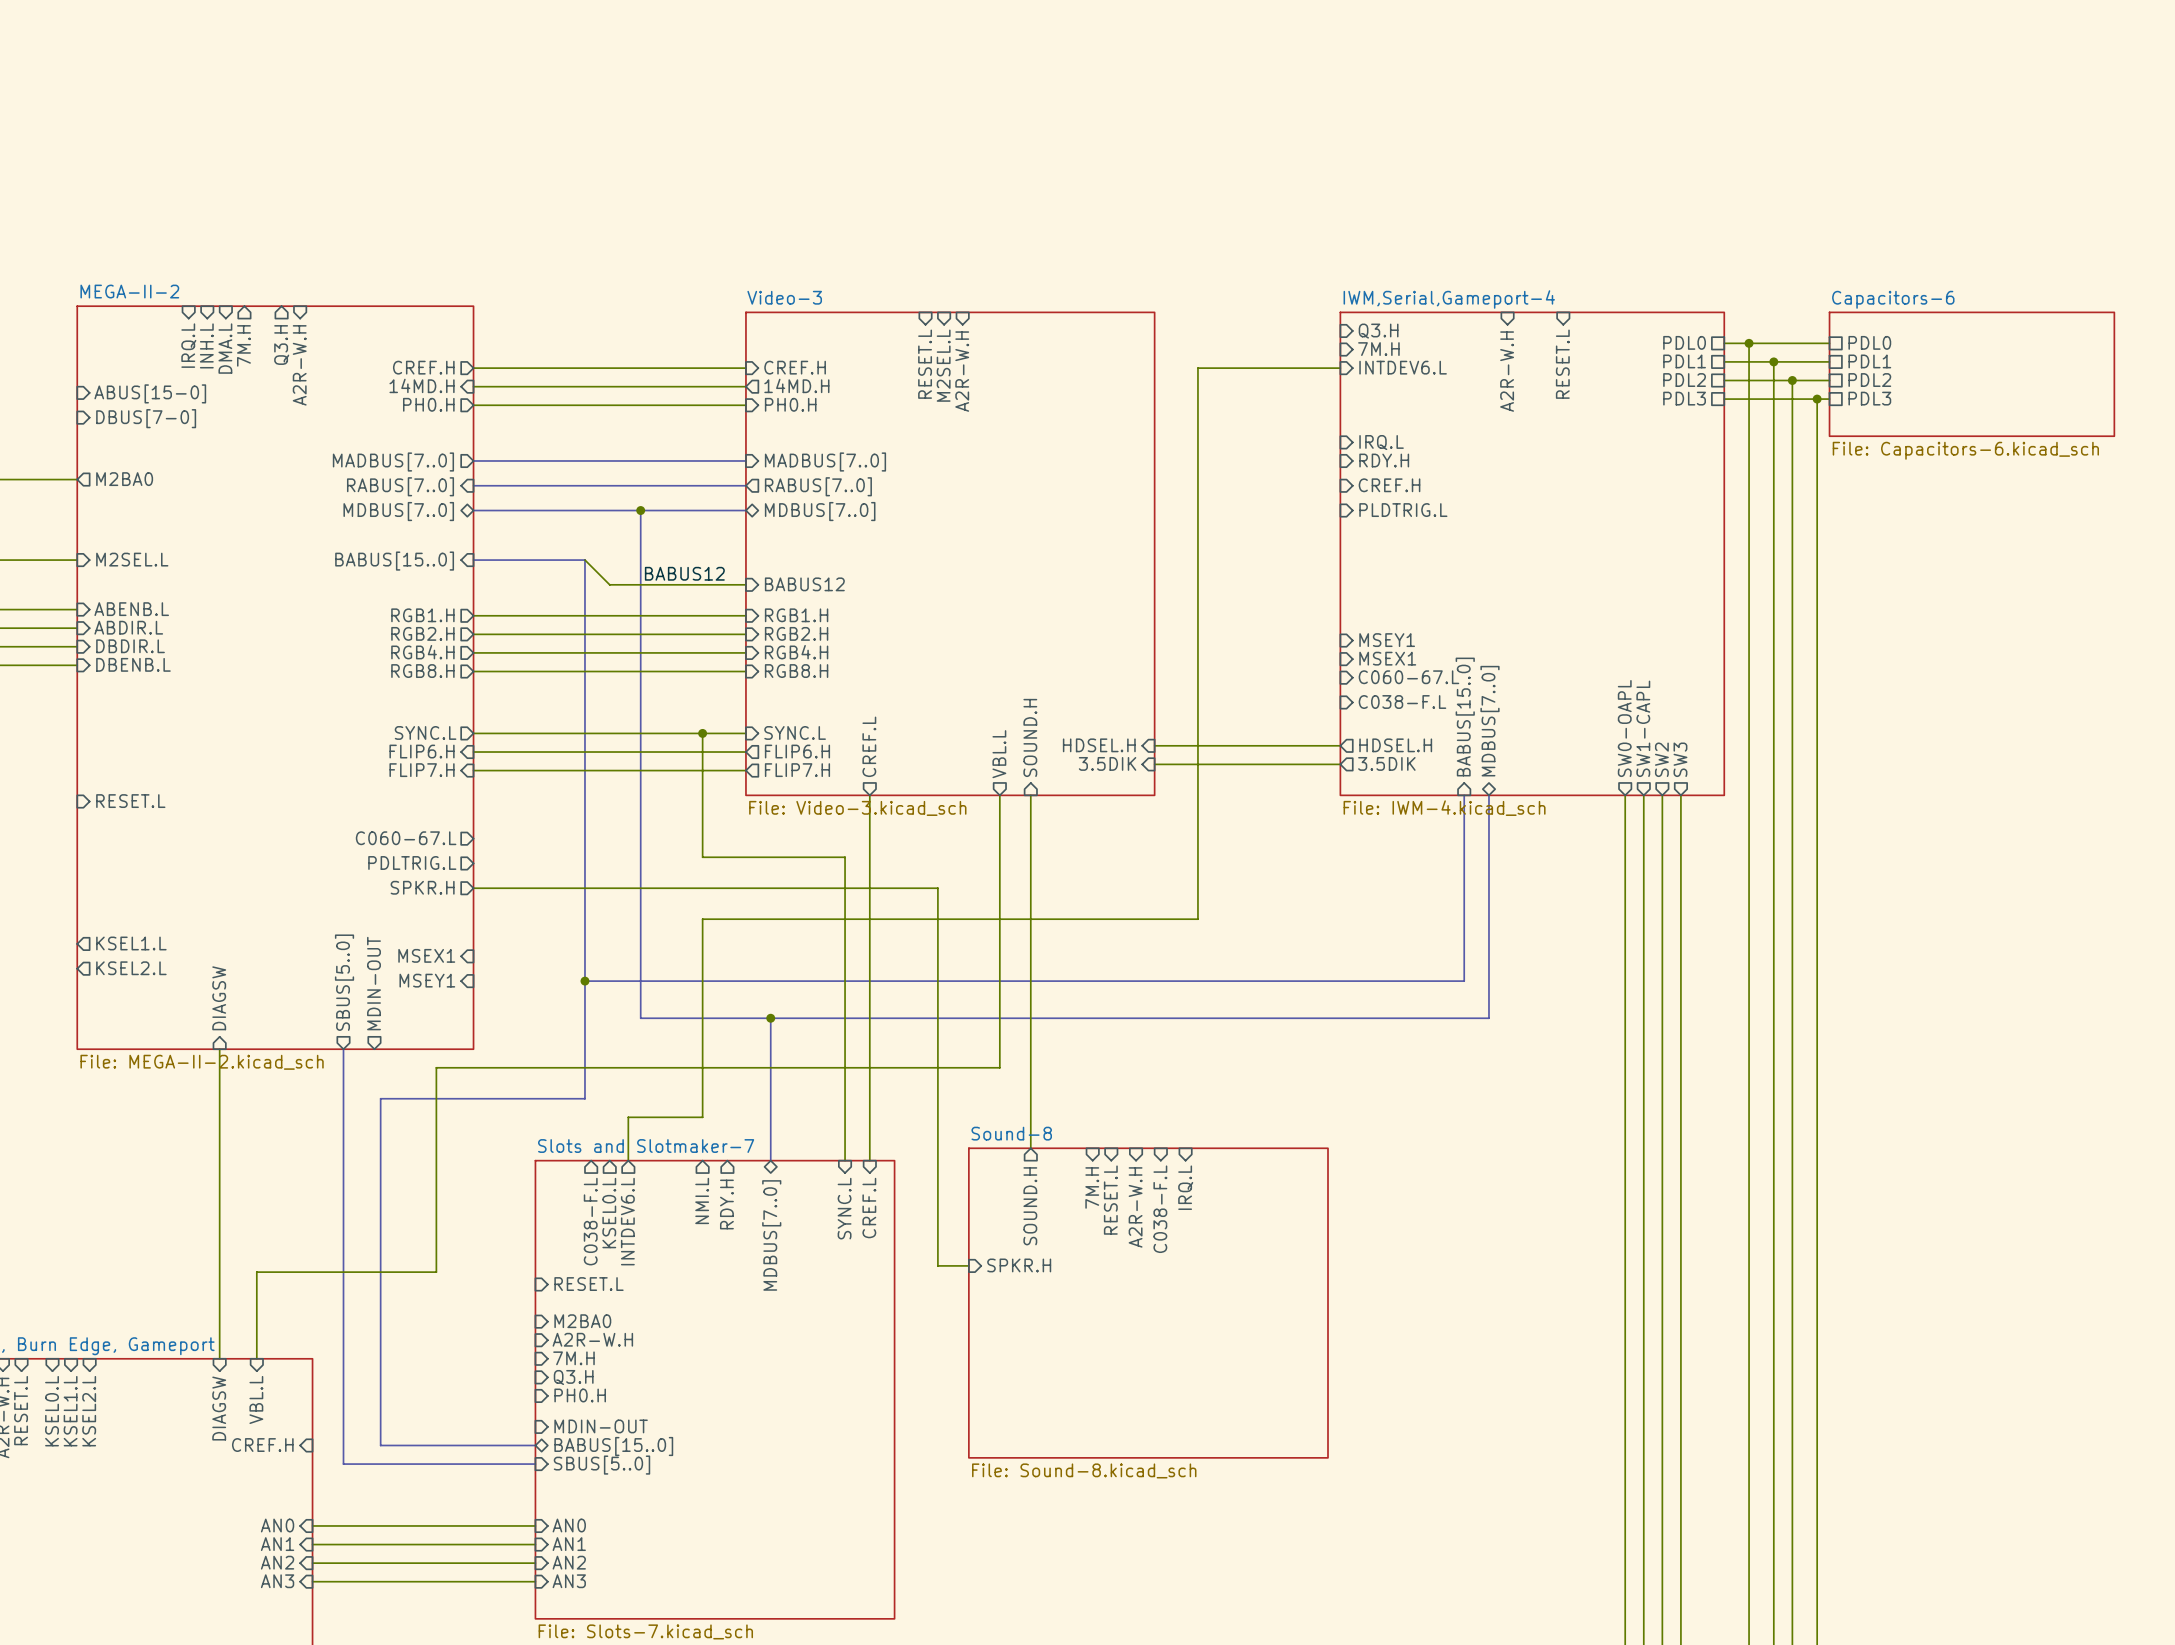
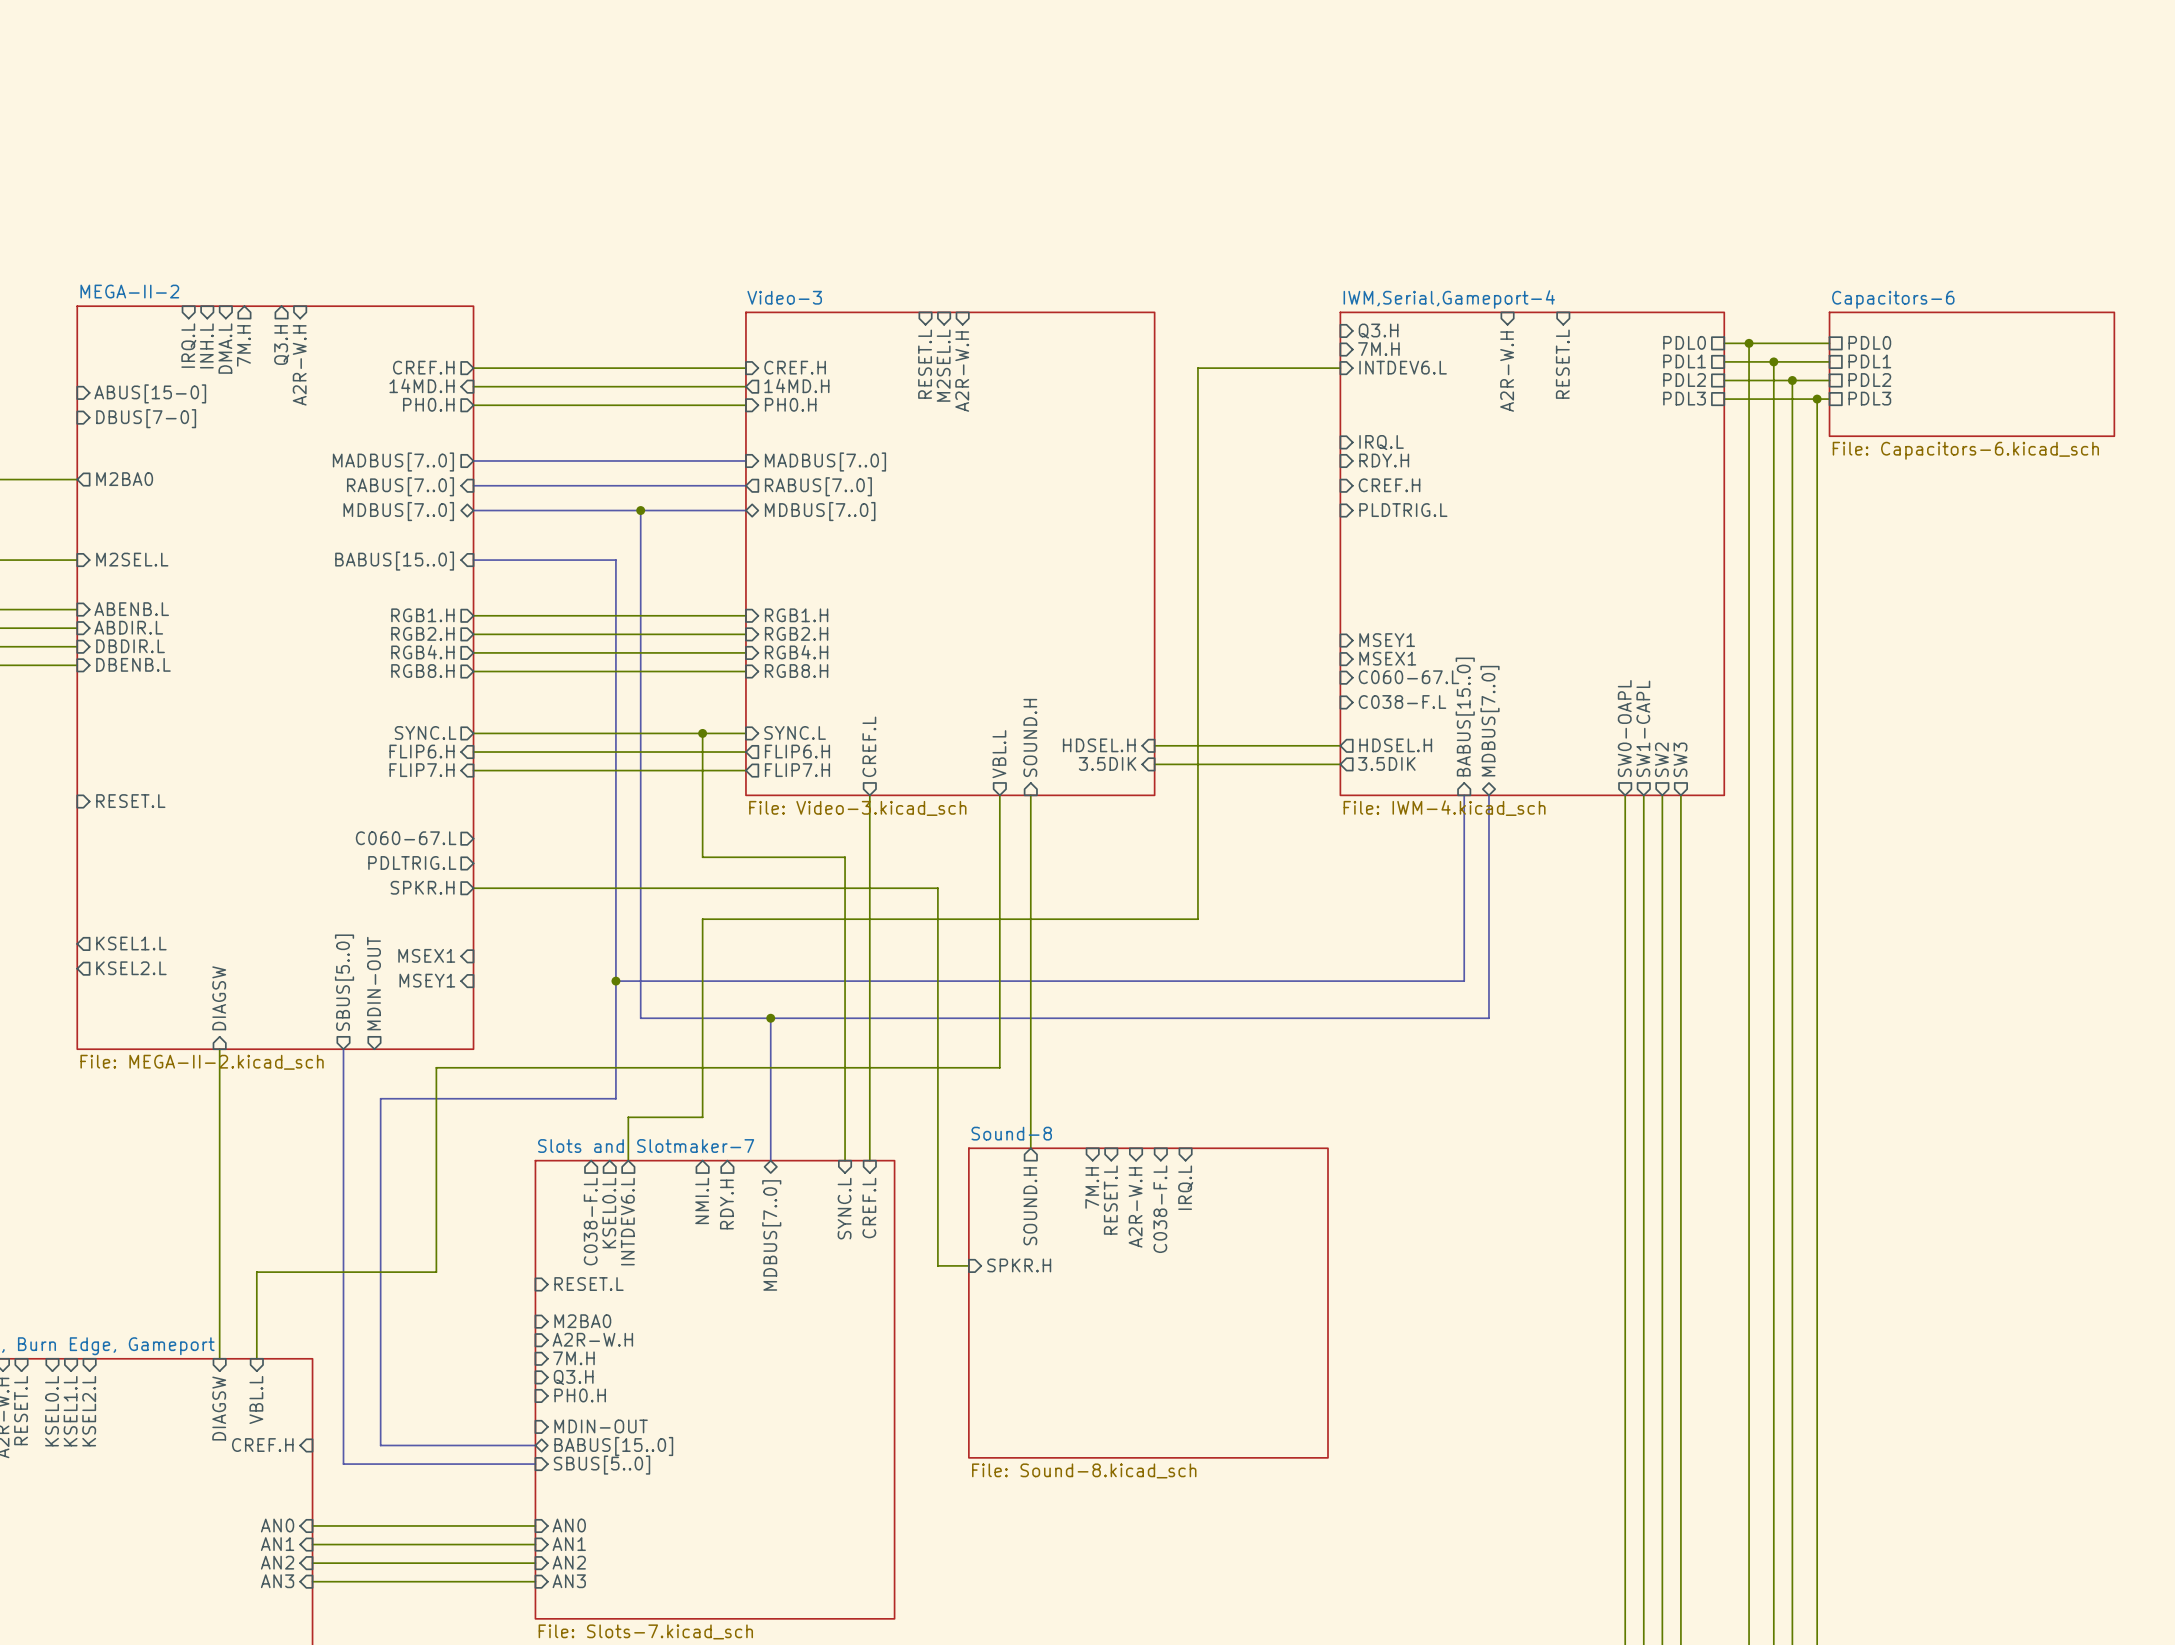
wire: (584, 560) (609, 584) -> none
bus: (584, 560) (584, 1098) -> (584, 560) (615, 560) (615, 1098) (584, 1098)
label: BABUS12 (684, 573) -> none
wire: (609, 584) (745, 584) -> none
sheet pin: BABUS12 (804, 584) -> none
bus: (584, 981) (615, 981) -> none
junction position: (584, 981) -> (615, 981)

